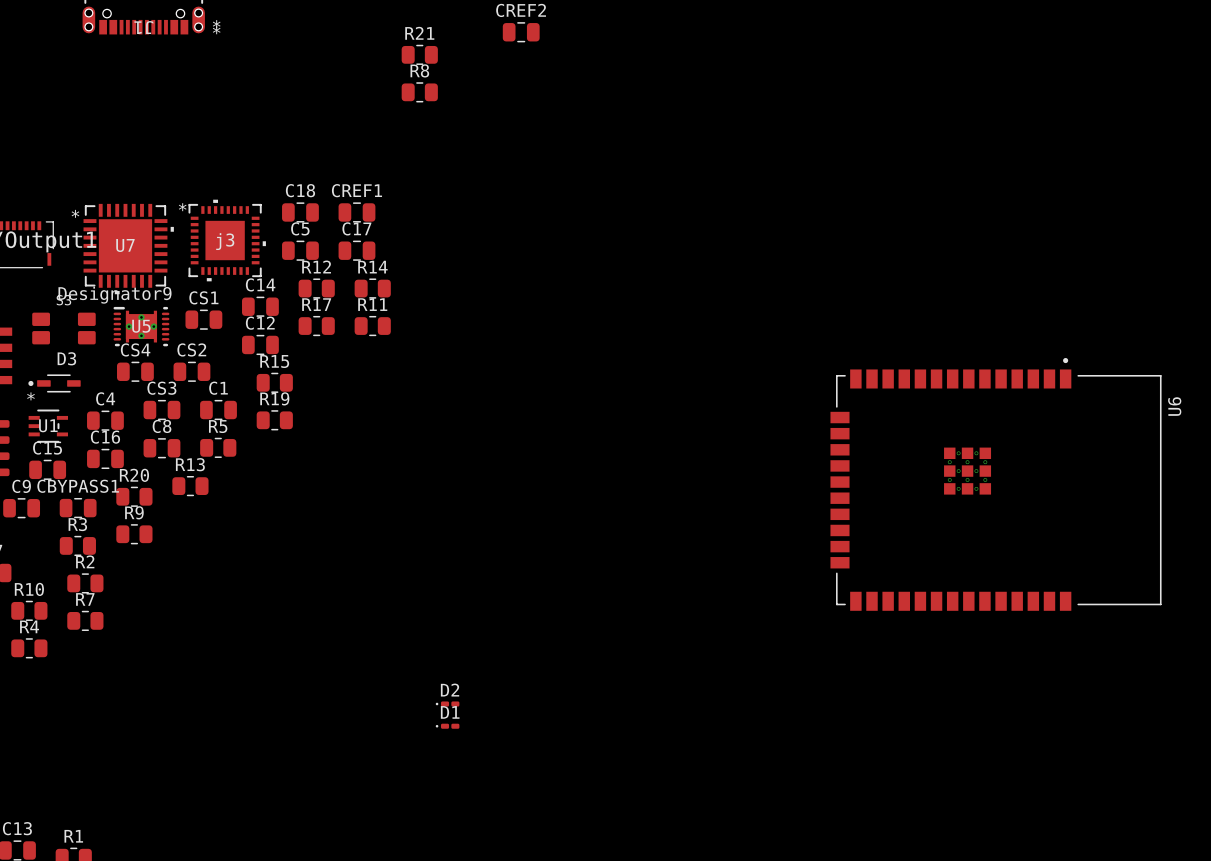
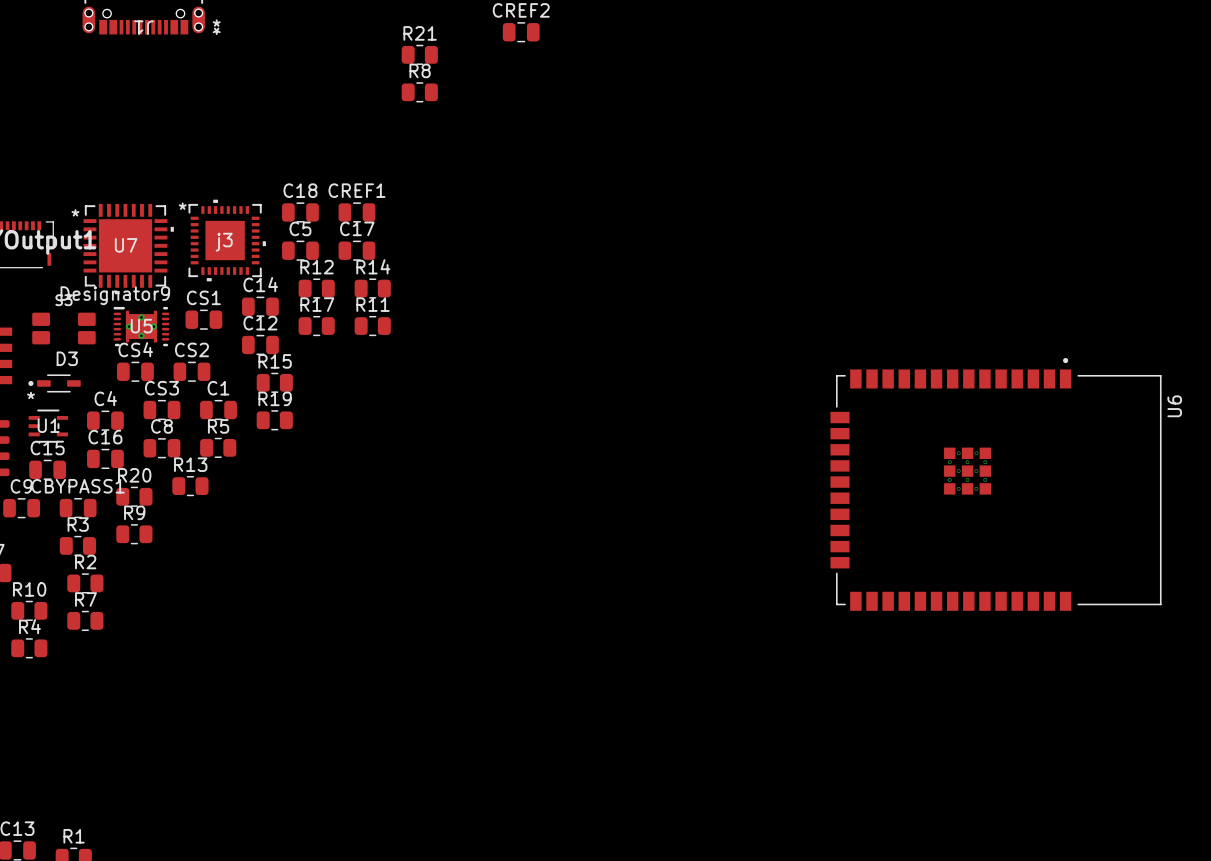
D2: (447, 704) -> none
D1: (447, 726) -> none

